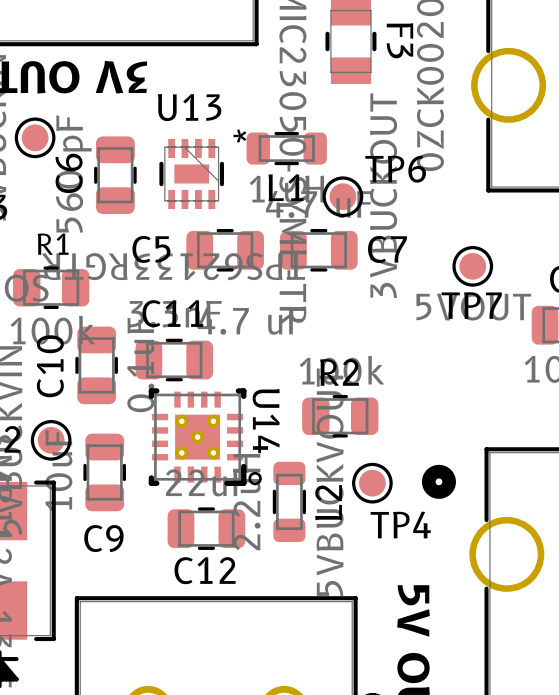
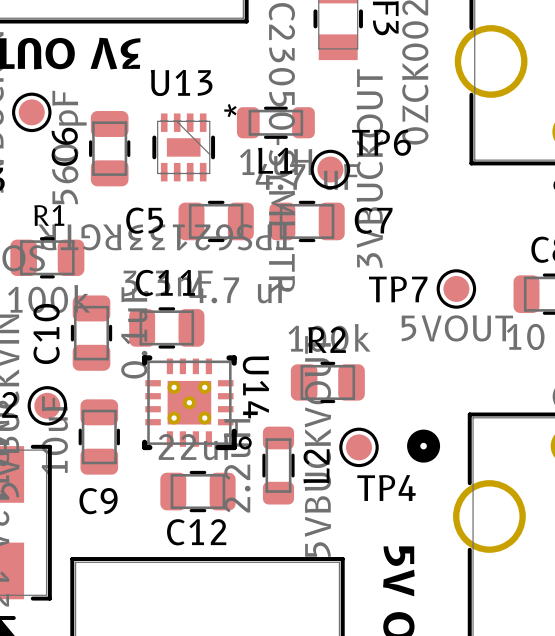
TP7 position: (472, 266) -> (456, 288)
TP7 name position: TP7 (471, 305) -> TP7 (398, 289)

